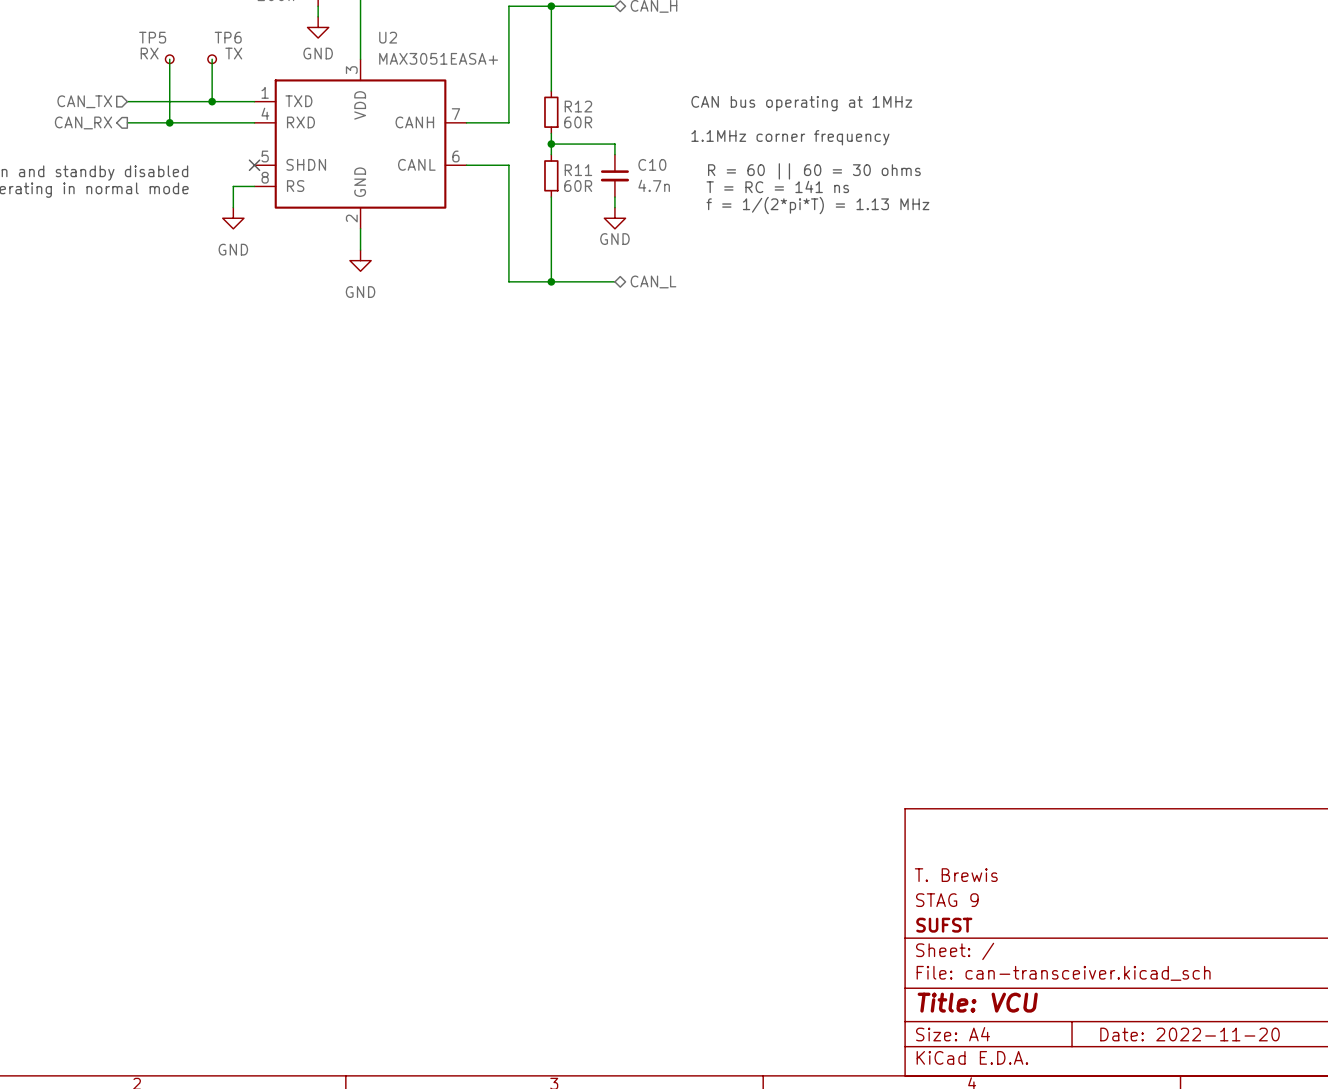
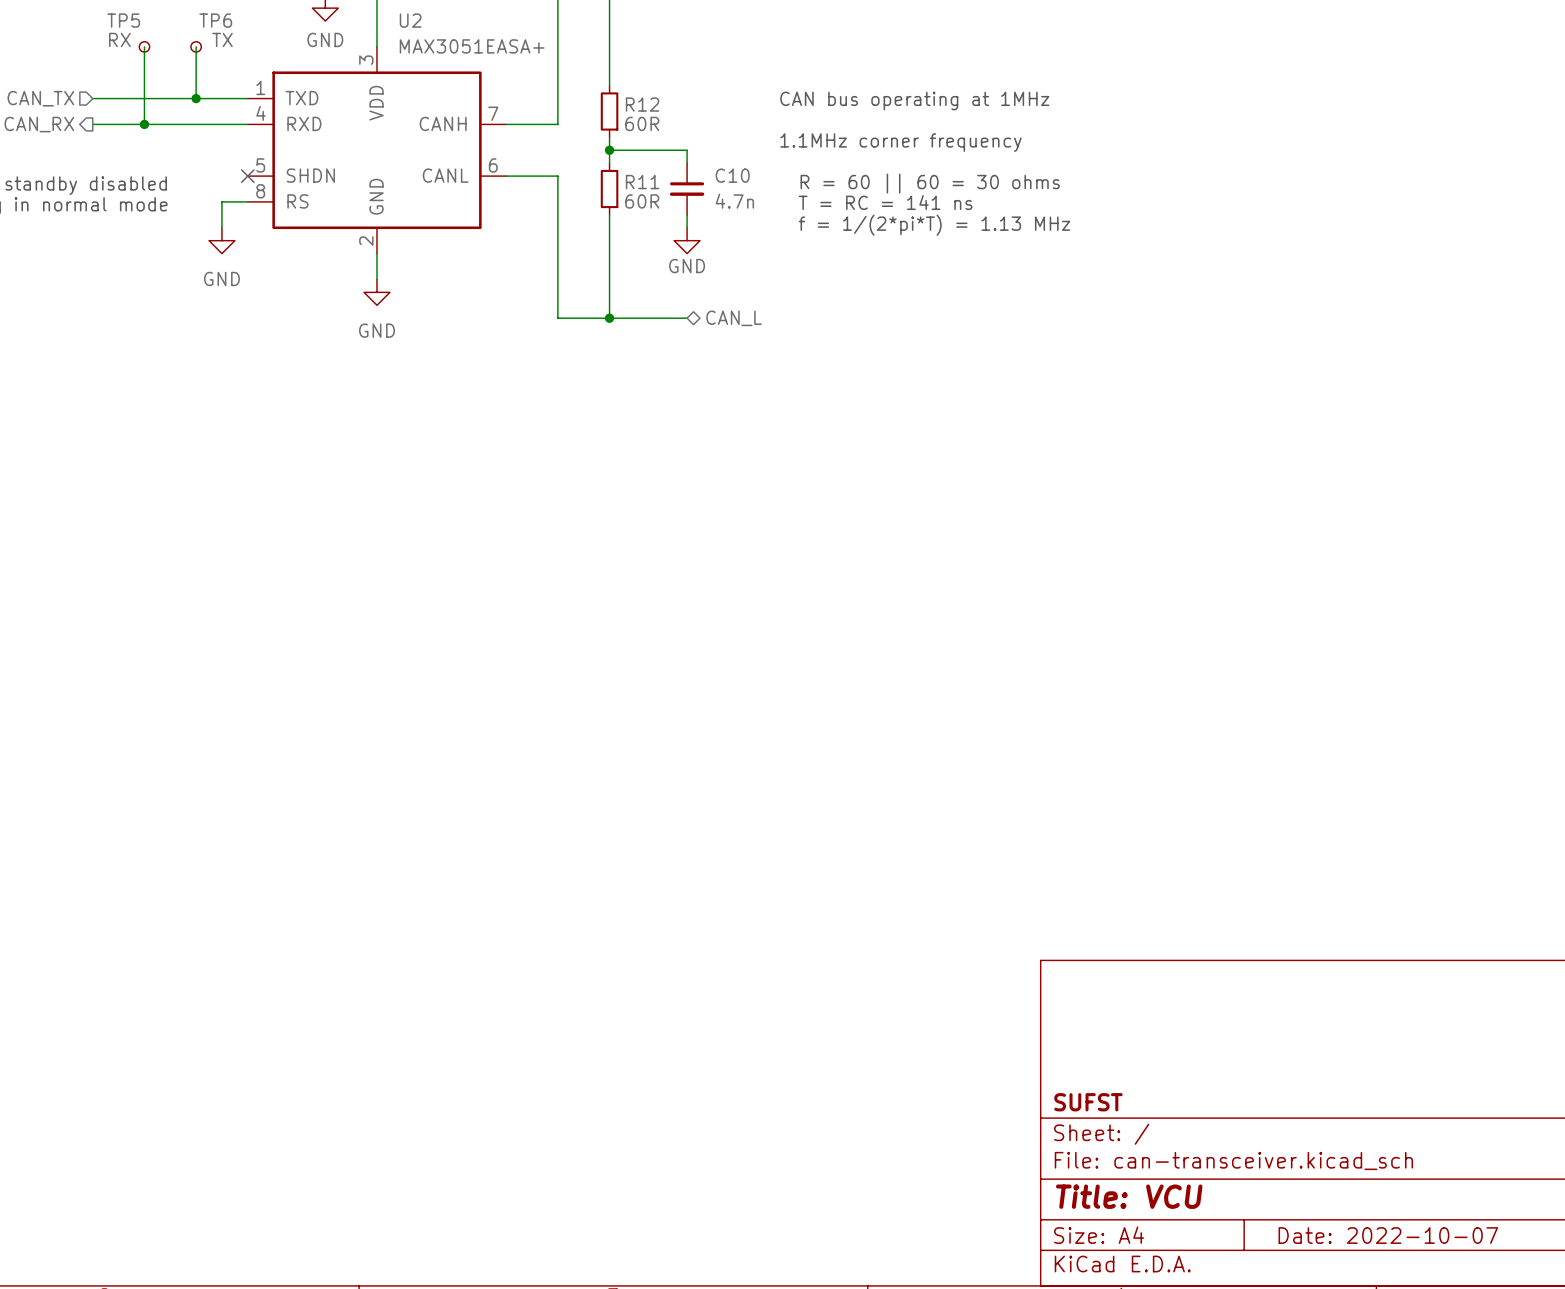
title block: T. Brewis (956, 875) -> none
title block: STAG 9 (947, 900) -> none
title block: Date: 2022-11-20 (1190, 1034) -> Date: 2022-10-07 (1388, 1235)

